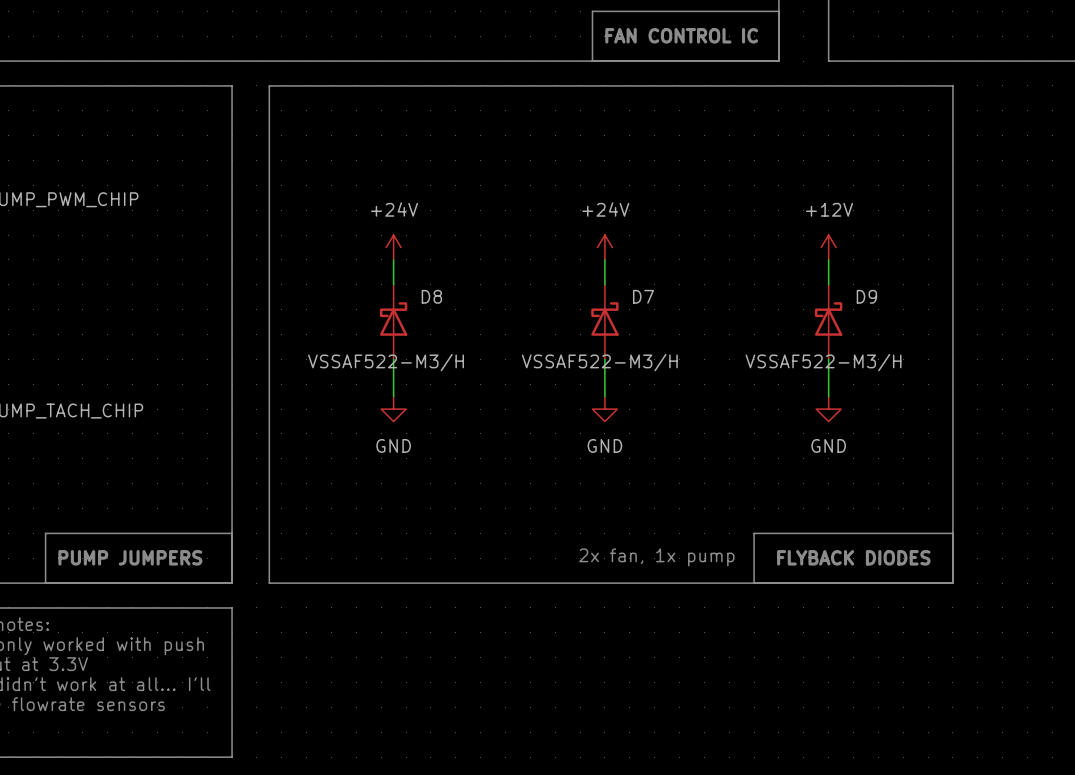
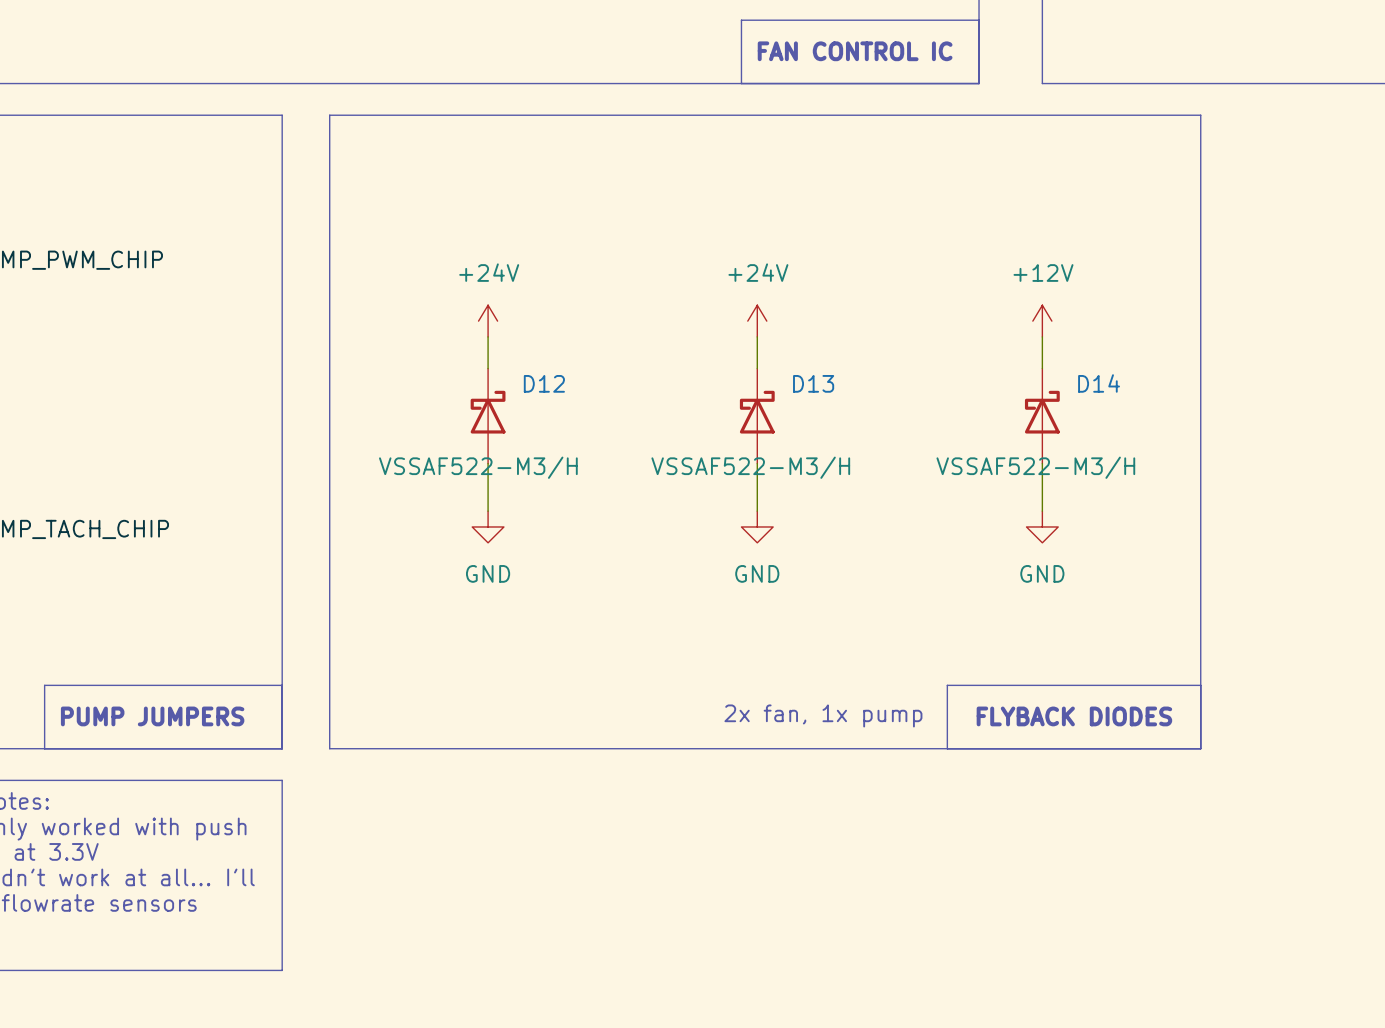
D8 name: D8 (431, 296) -> D12 (544, 383)
D7 name: D7 (643, 296) -> D13 (813, 383)
D9 name: D9 (866, 296) -> D14 (1099, 383)

